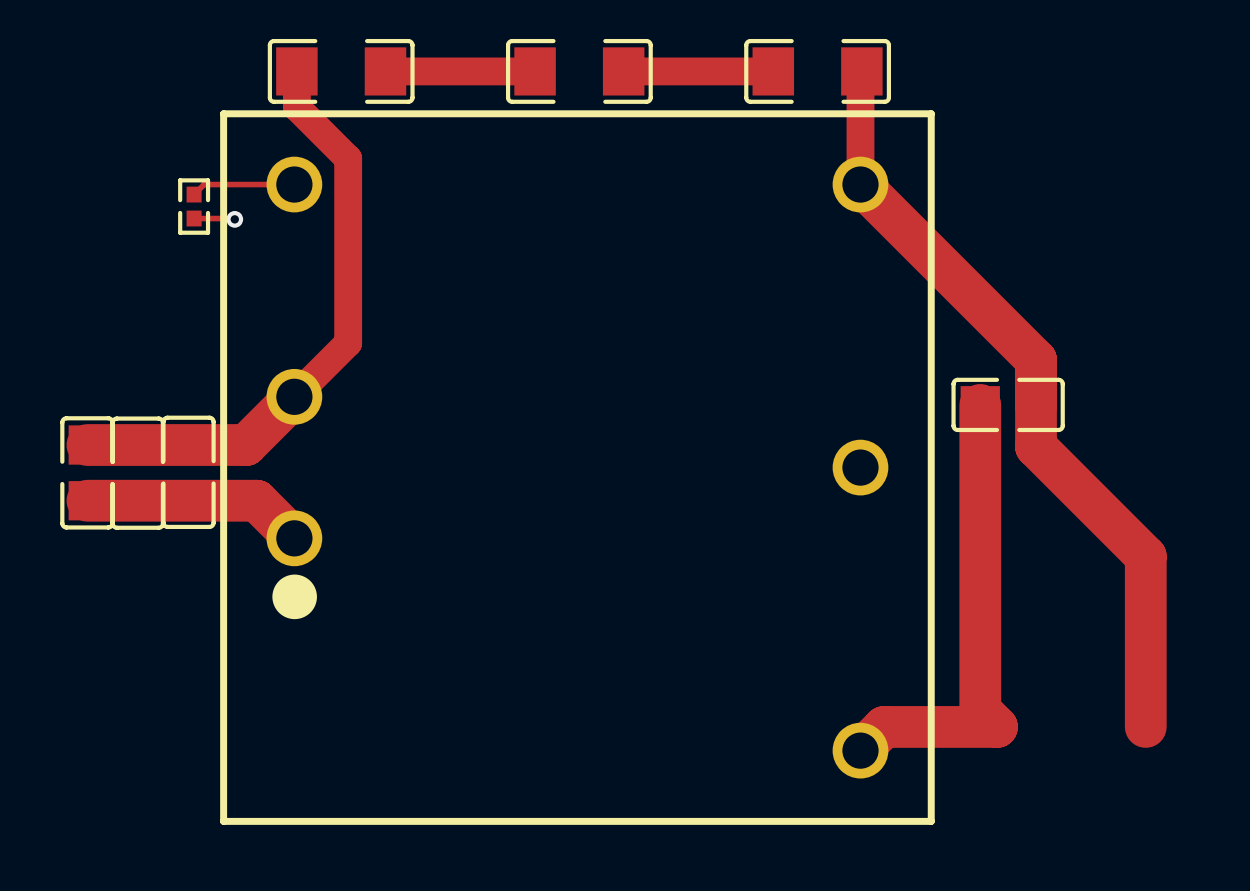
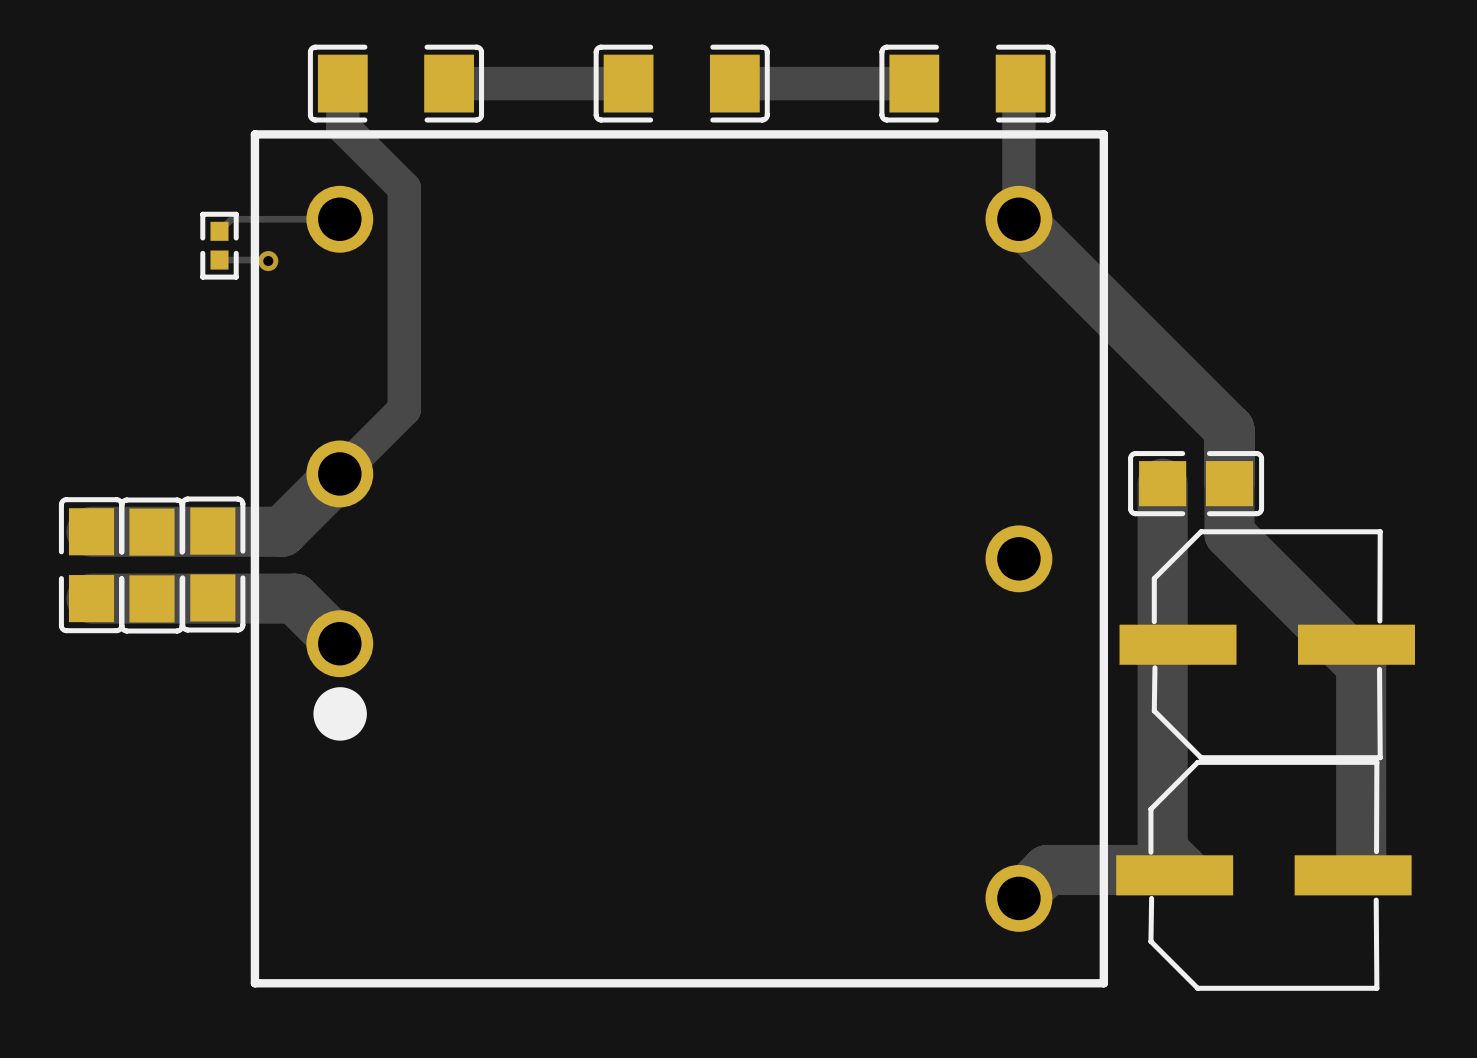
part: none -> (1267, 644)
part: none -> (1263, 875)

